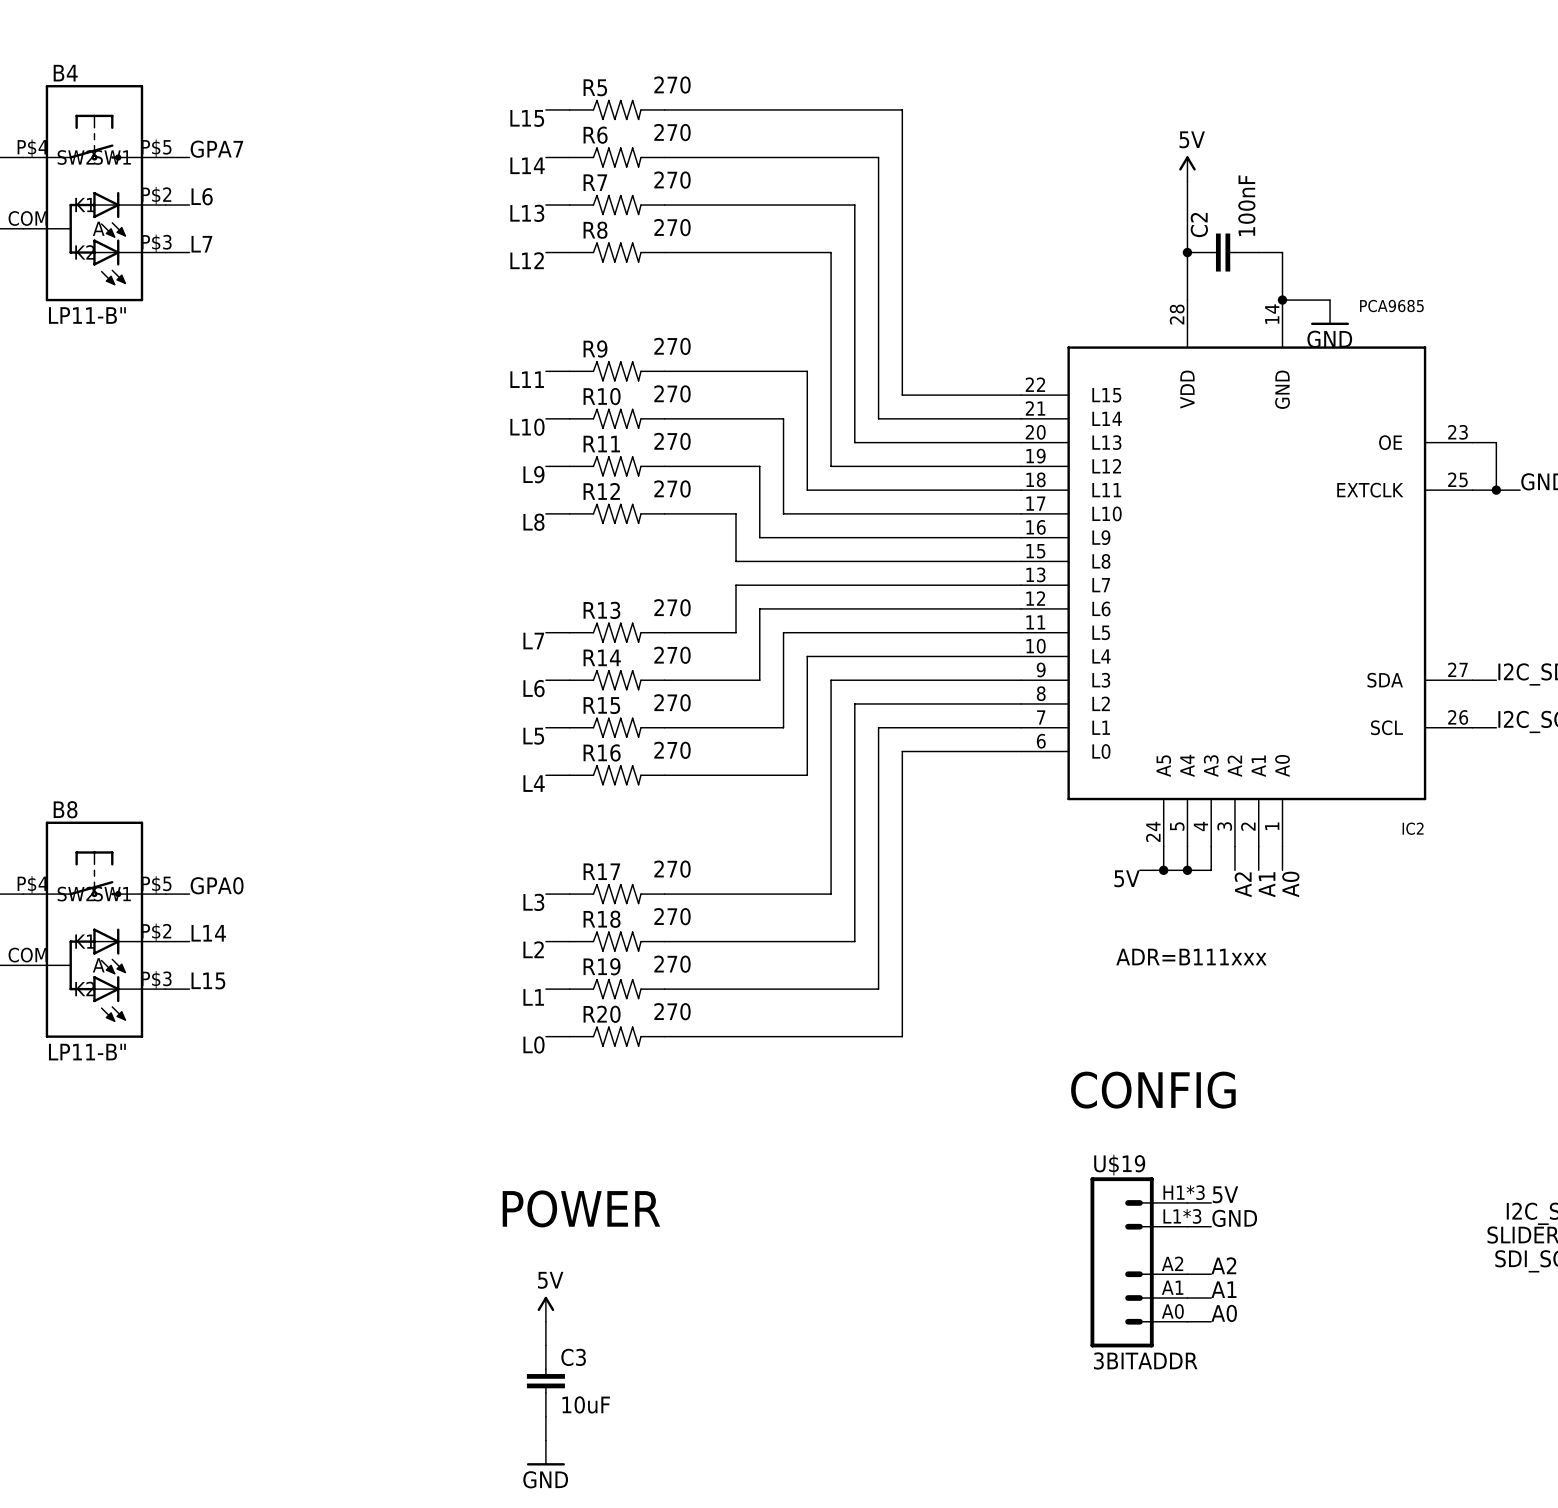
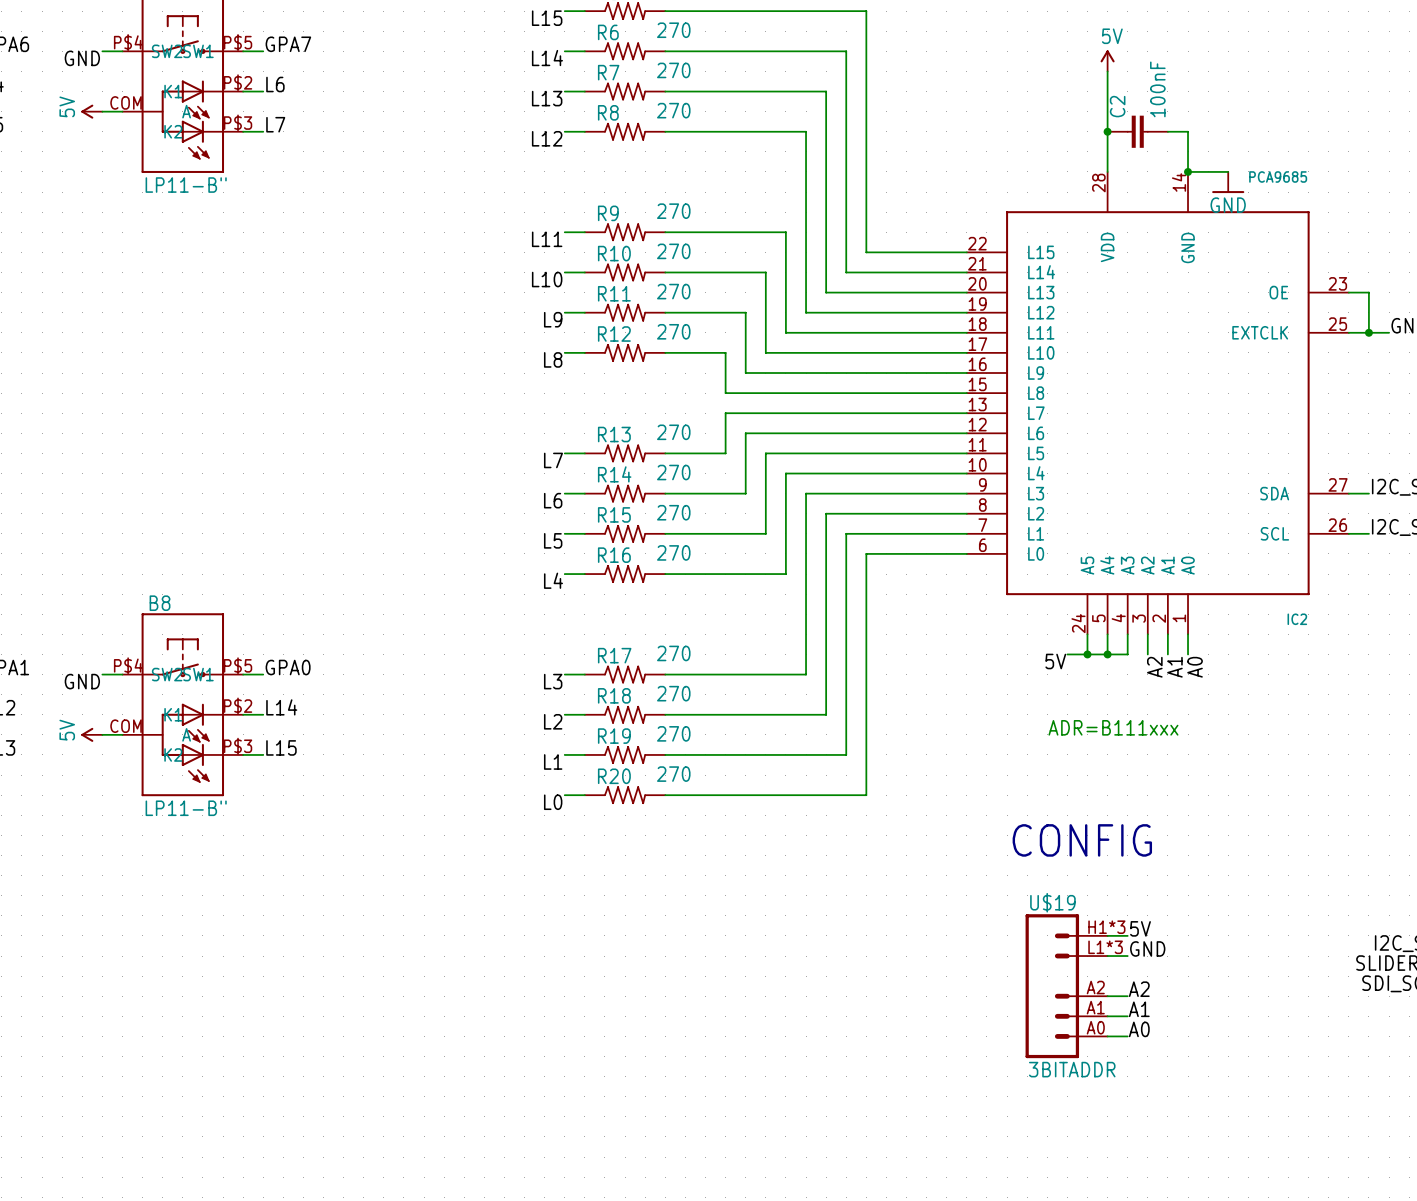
text: POWER (581, 1208) -> none
power symbol: 5V (545, 1309) -> none
wire: (545, 1321) (545, 1345) -> none
C3: 10uF (545, 1381) -> none
wire: (545, 1416) (545, 1440) -> none
power symbol: GND (545, 1453) -> none

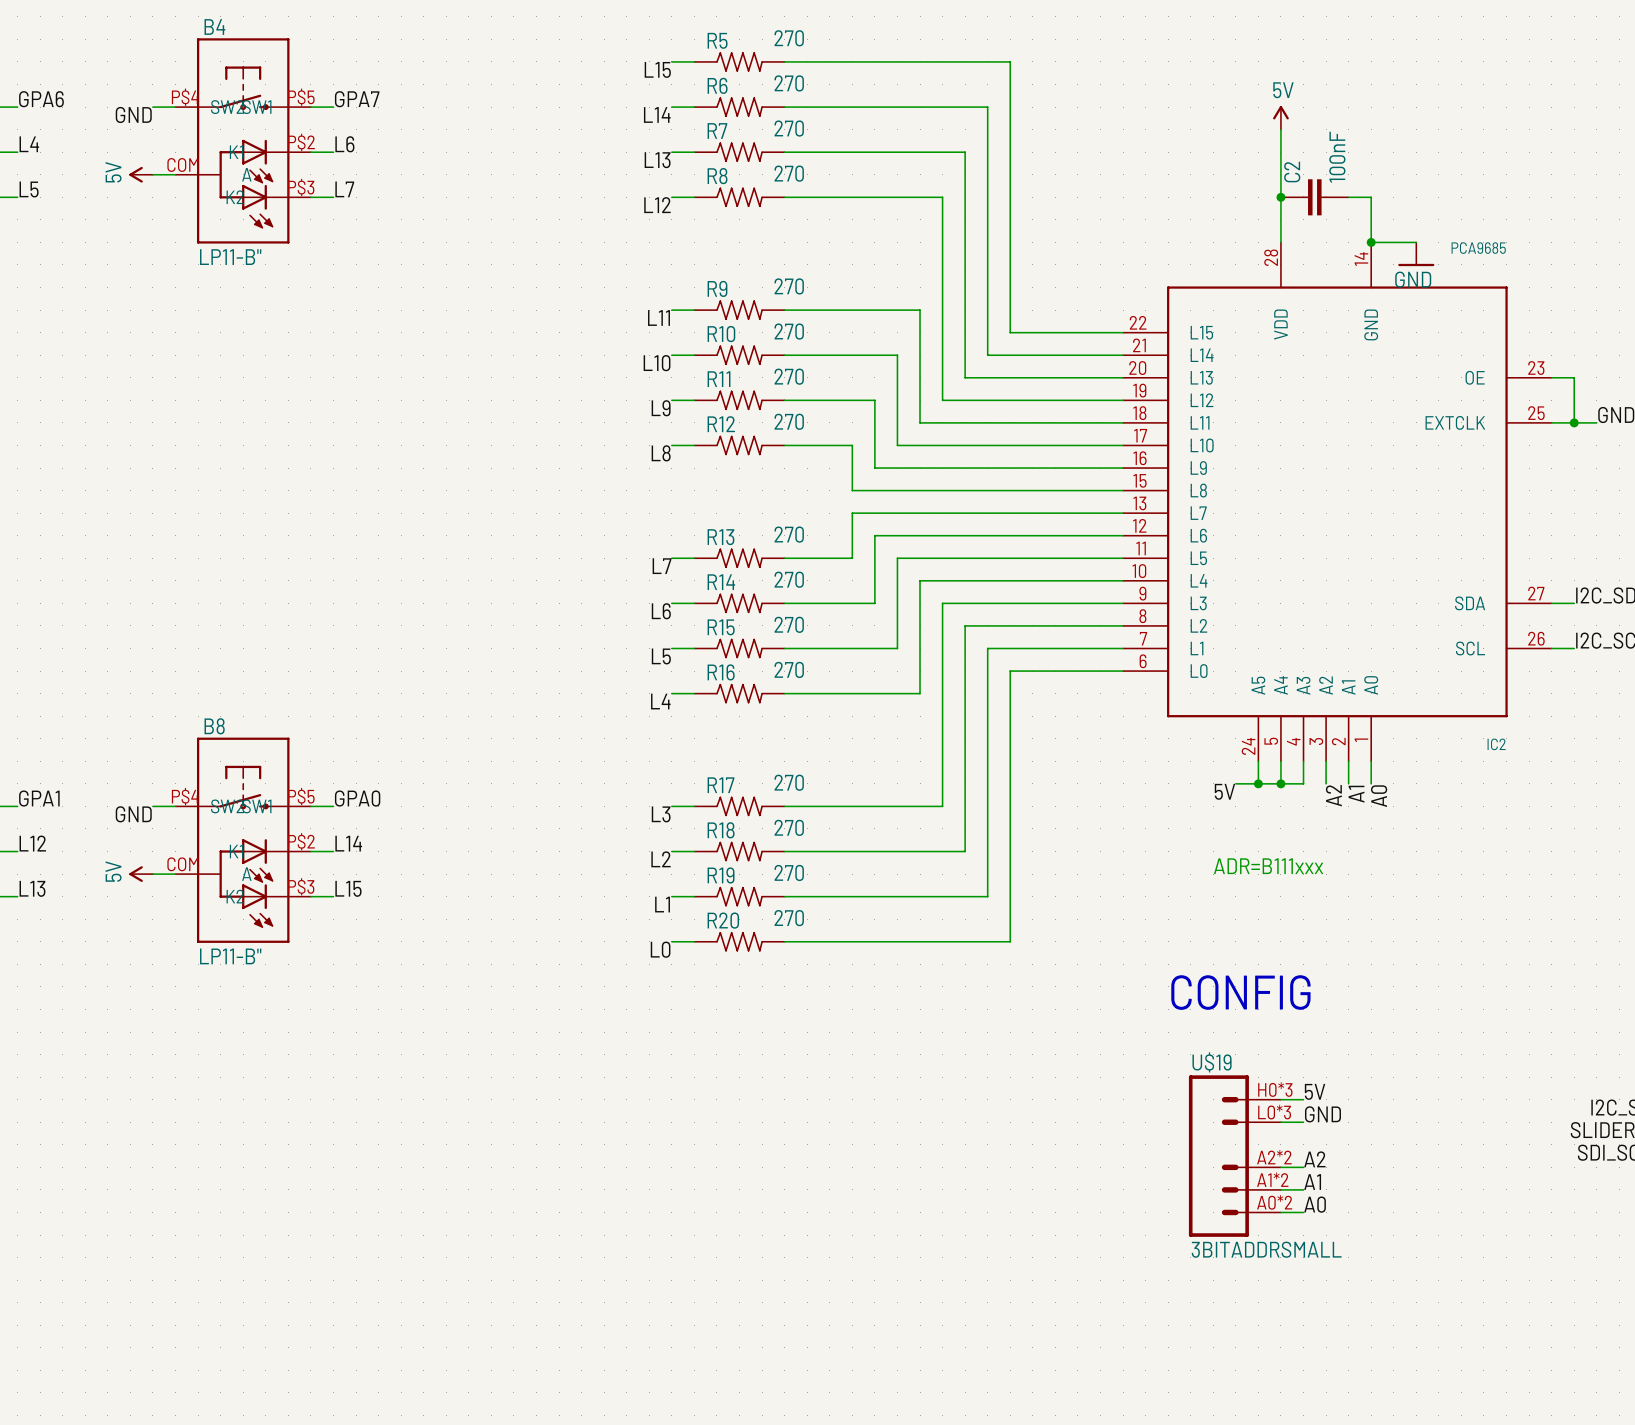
U$19 pin number: H1*3 (1106, 927) -> H0*3 (1275, 1089)
U$19 pin number: L1*3 (1105, 947) -> L0*3 (1274, 1112)
U$19 pin number: A2 (1095, 987) -> A2*2 (1274, 1157)
U$19 pin number: A1 (1095, 1007) -> A1*2 (1272, 1179)
U$19 pin number: A0 (1095, 1027) -> A0*2 (1274, 1202)
U$19 value: 3BITADDR (1072, 1069) -> 3BITADDRSMALL (1266, 1249)

